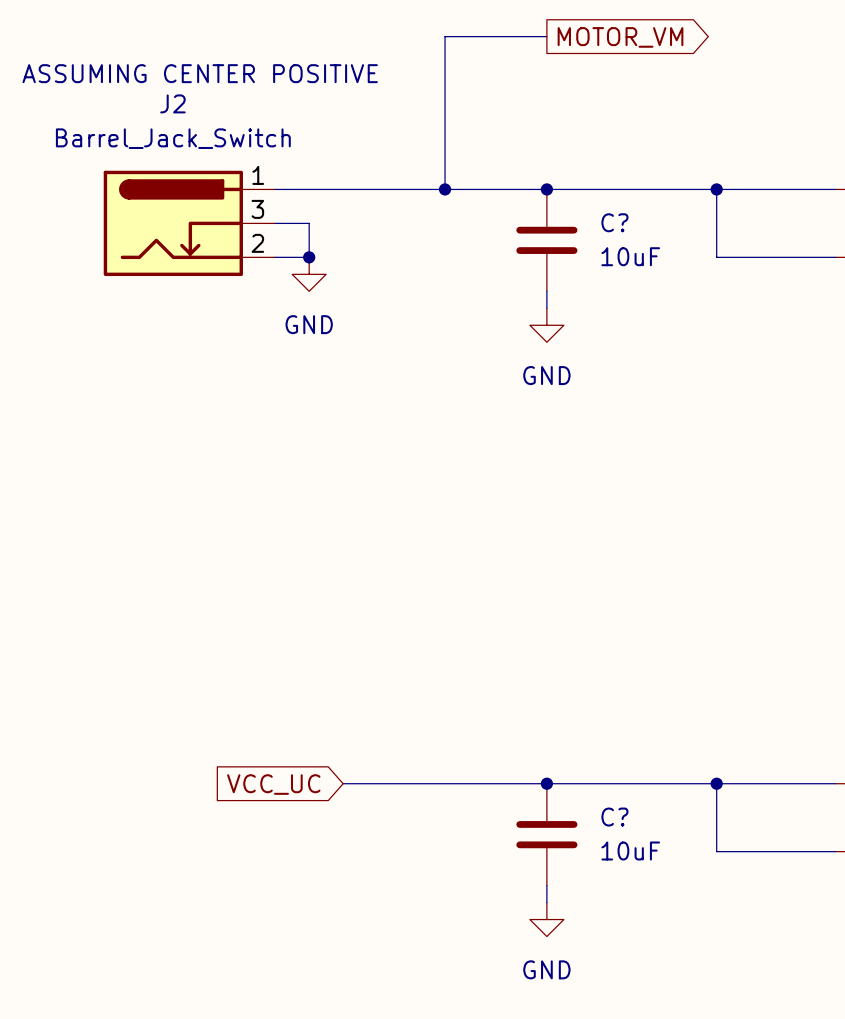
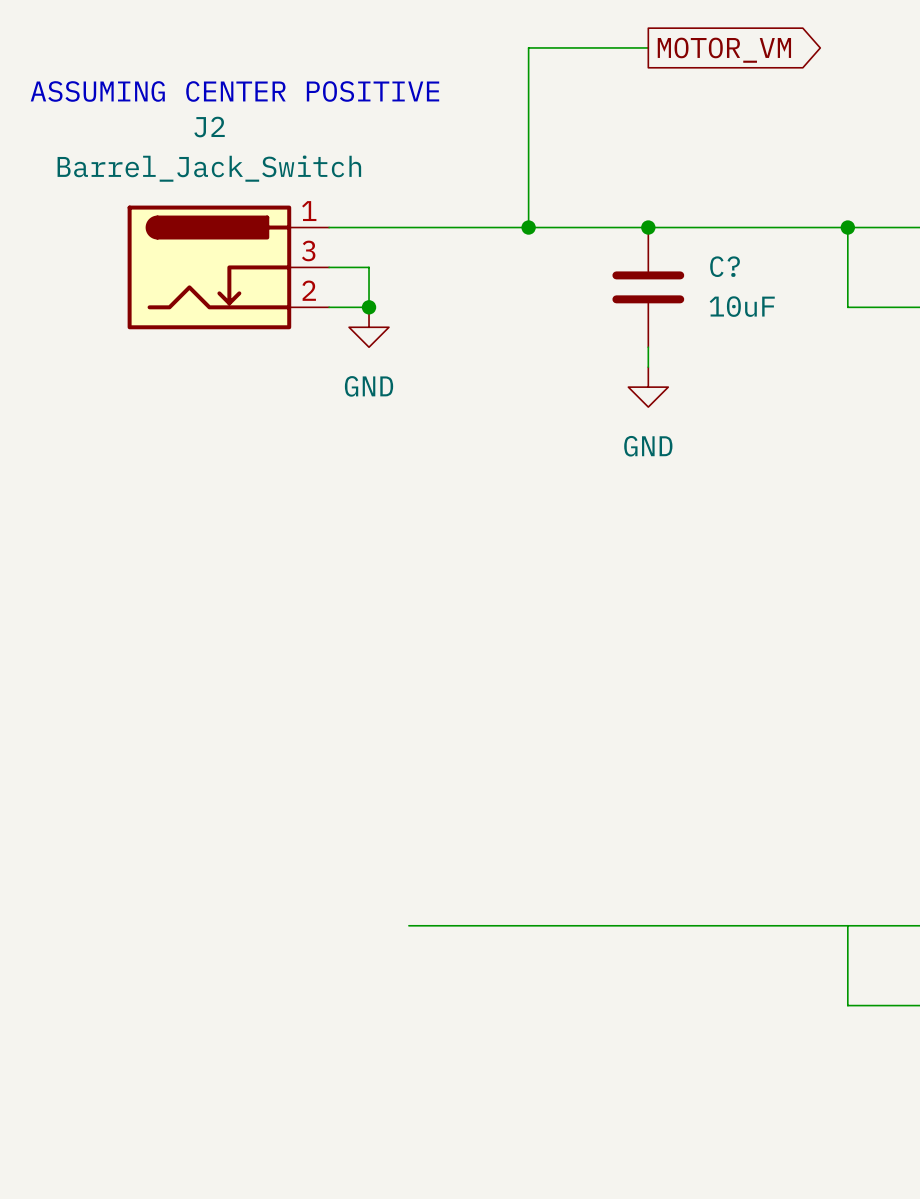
junction: (546, 783) -> none
junction: (716, 783) -> none
global label: VCC_UC (273, 784) -> none
C?: 10uF (546, 834) -> none
wire: (546, 885) (546, 902) -> none
power symbol: GND (546, 919) -> none

